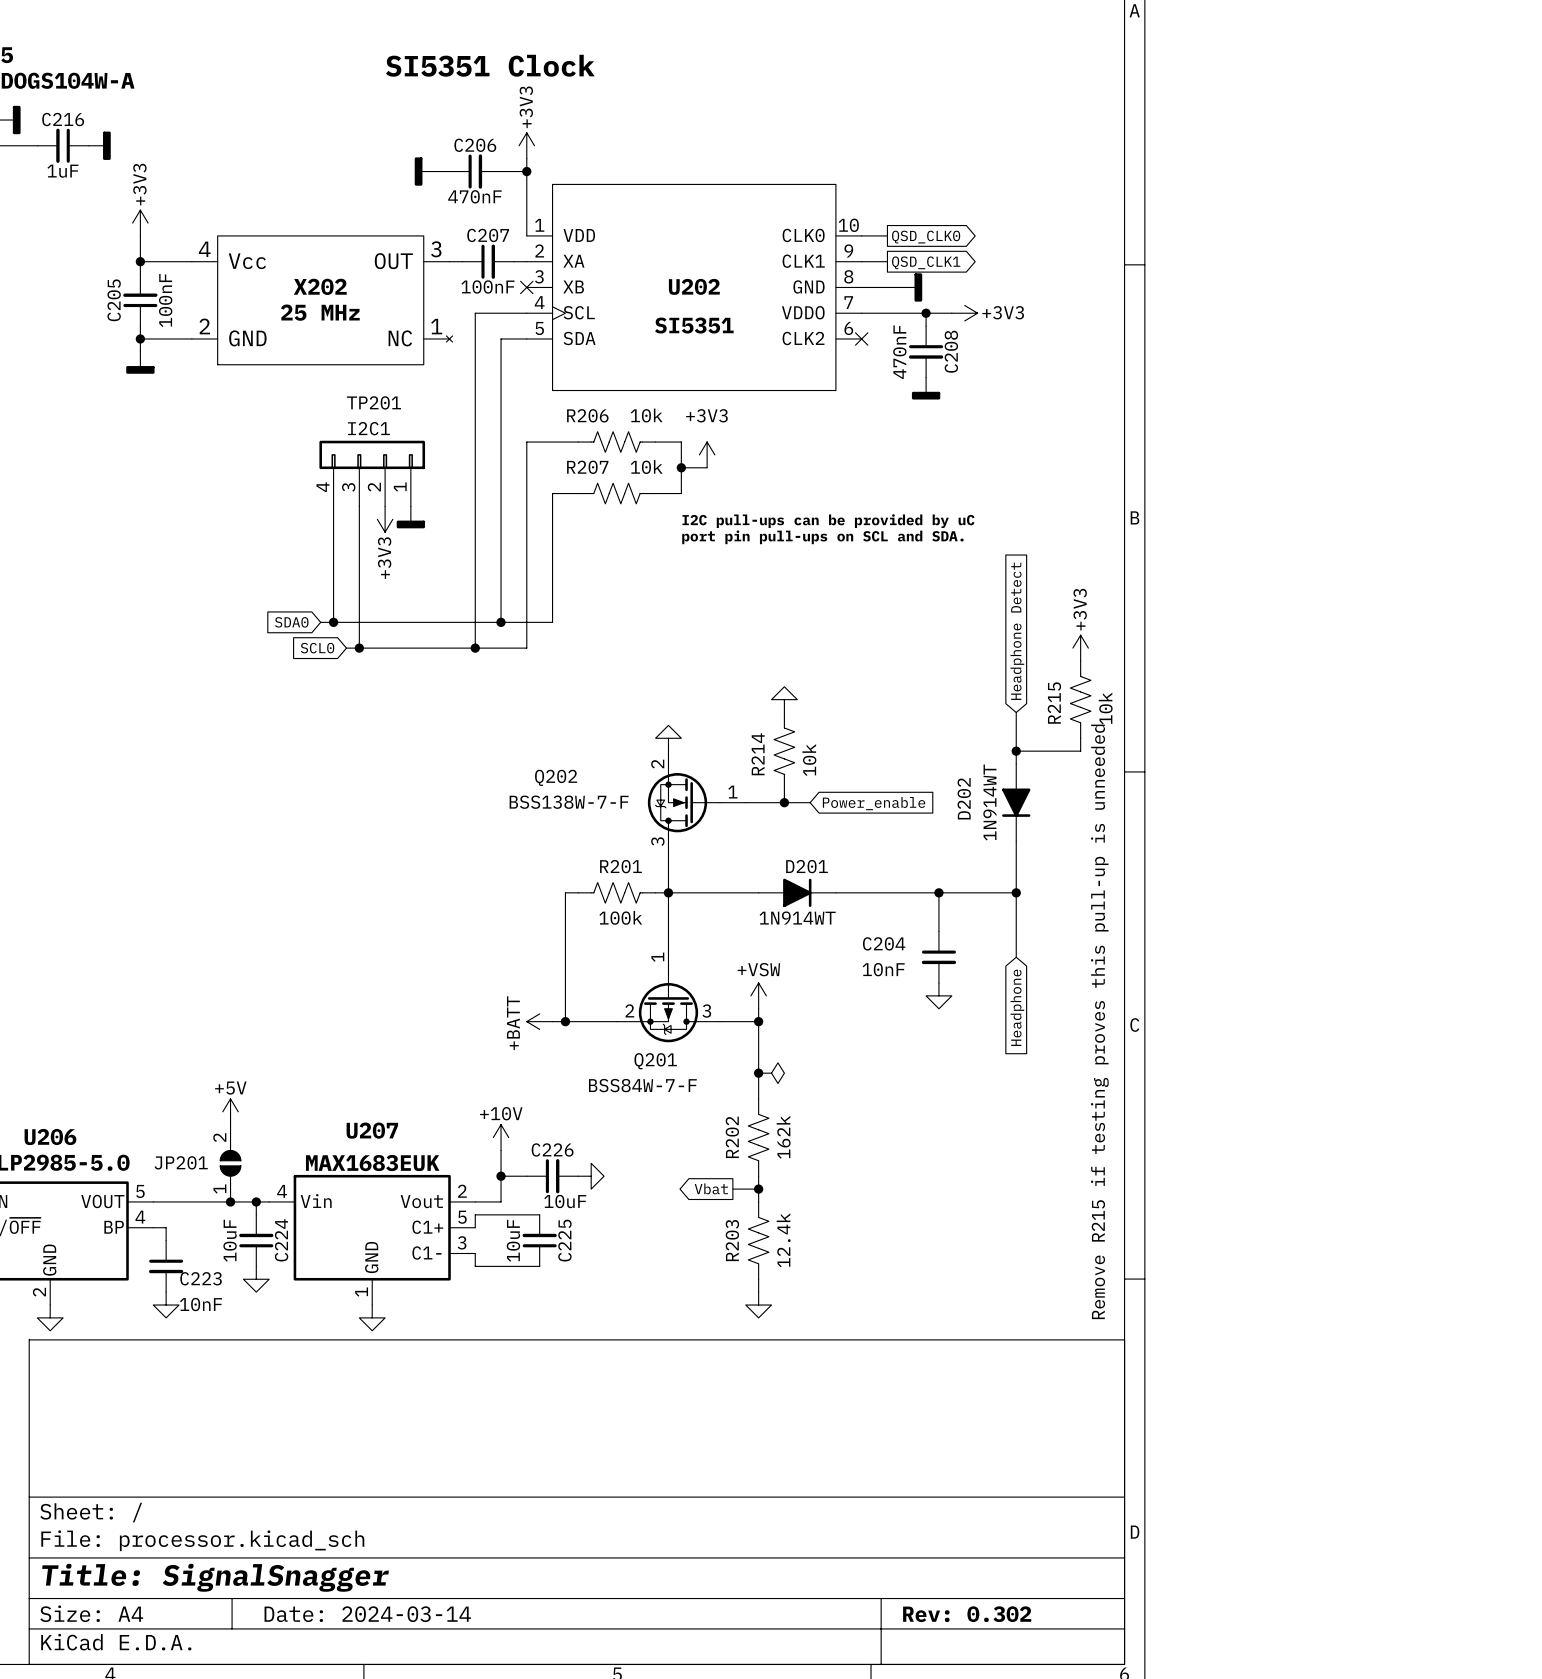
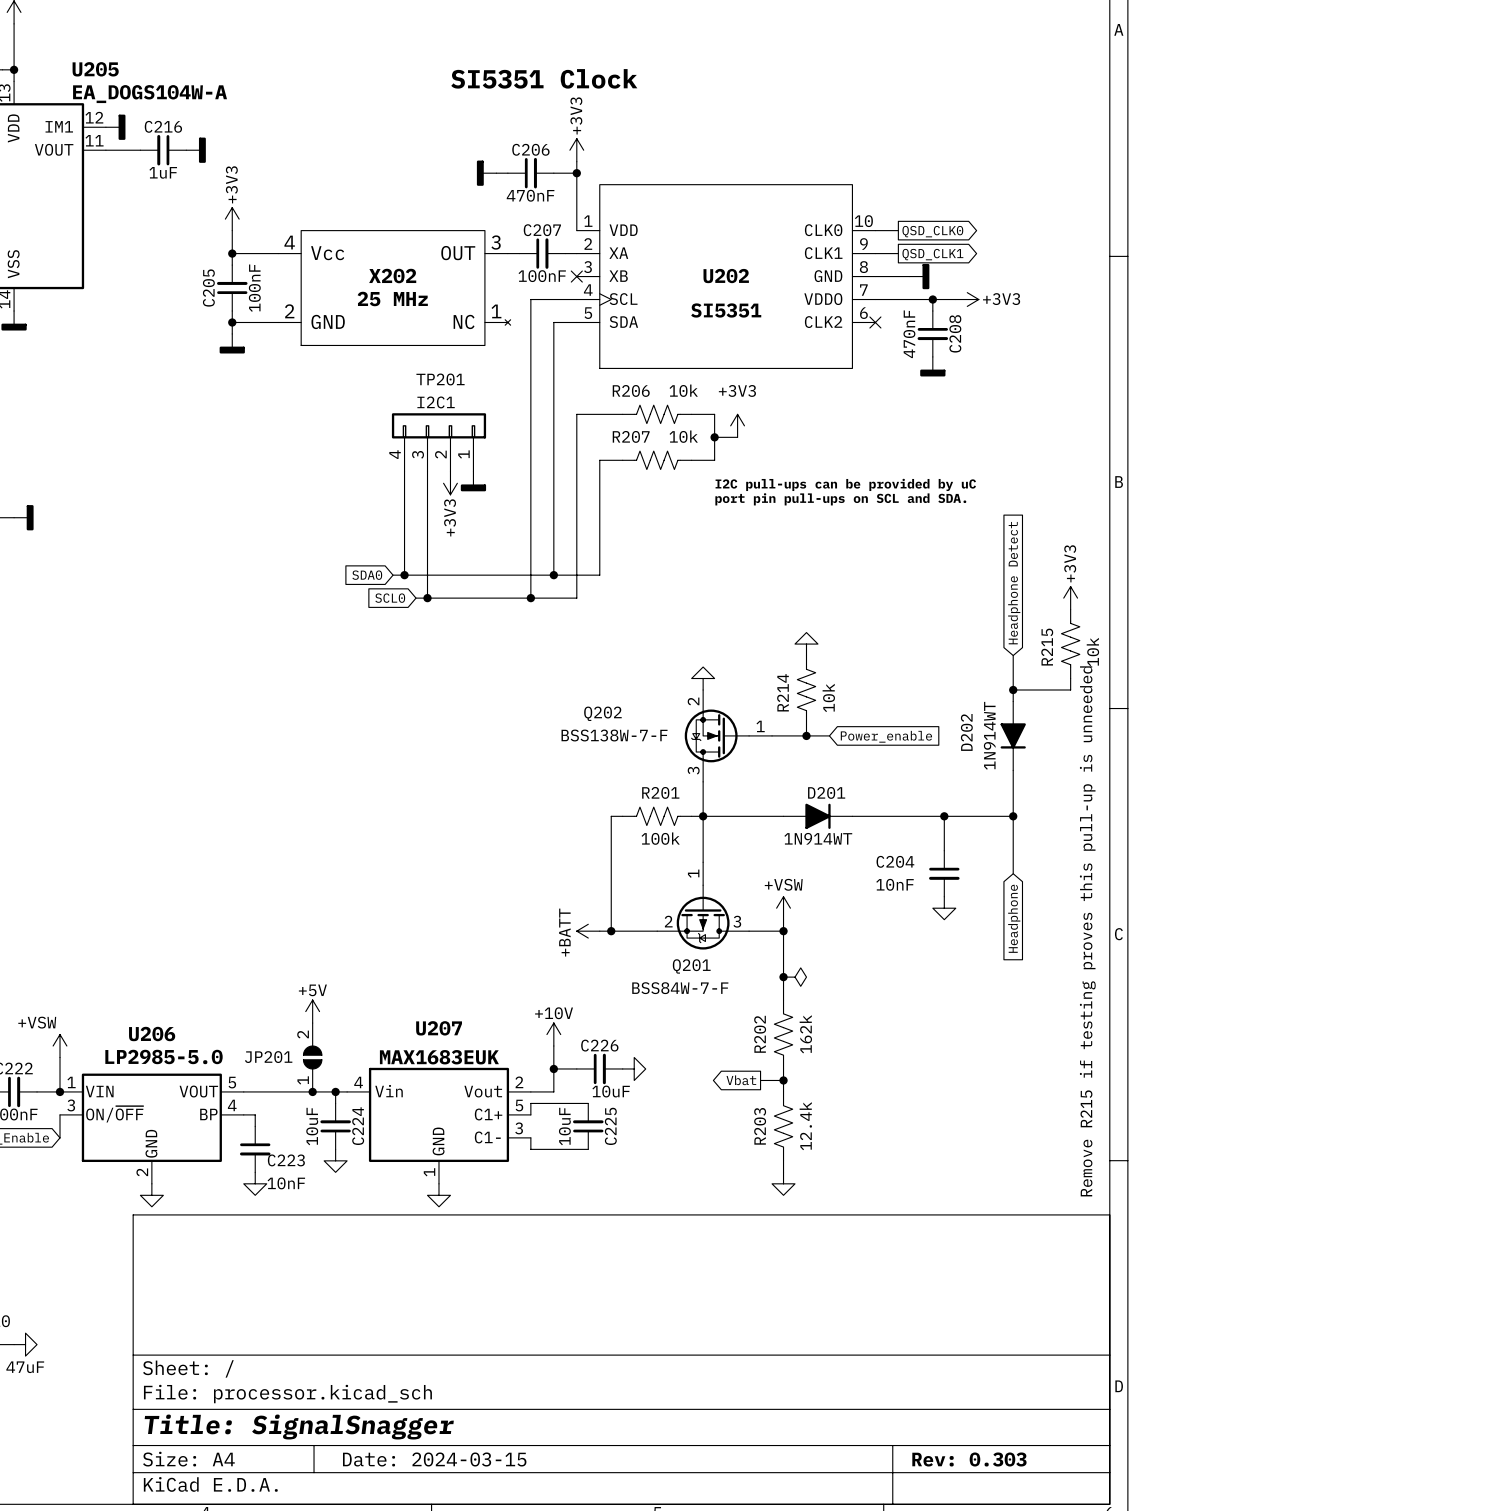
title block: Date: 2024-03-14 (367, 1614) -> Date: 2024-03-15 (434, 1459)
title block: Rev: 0.302 (967, 1614) -> Rev: 0.303 (969, 1459)

